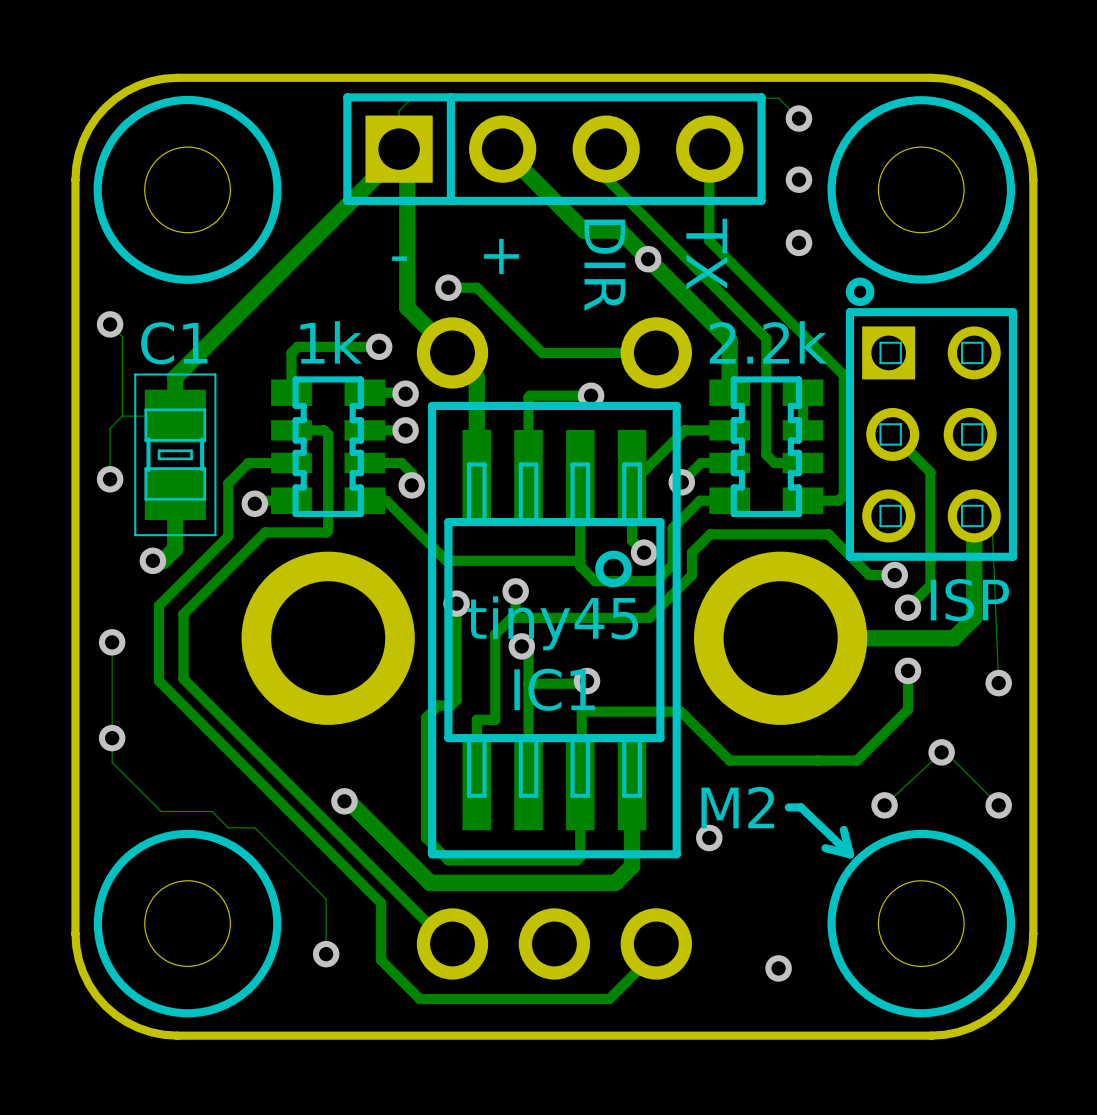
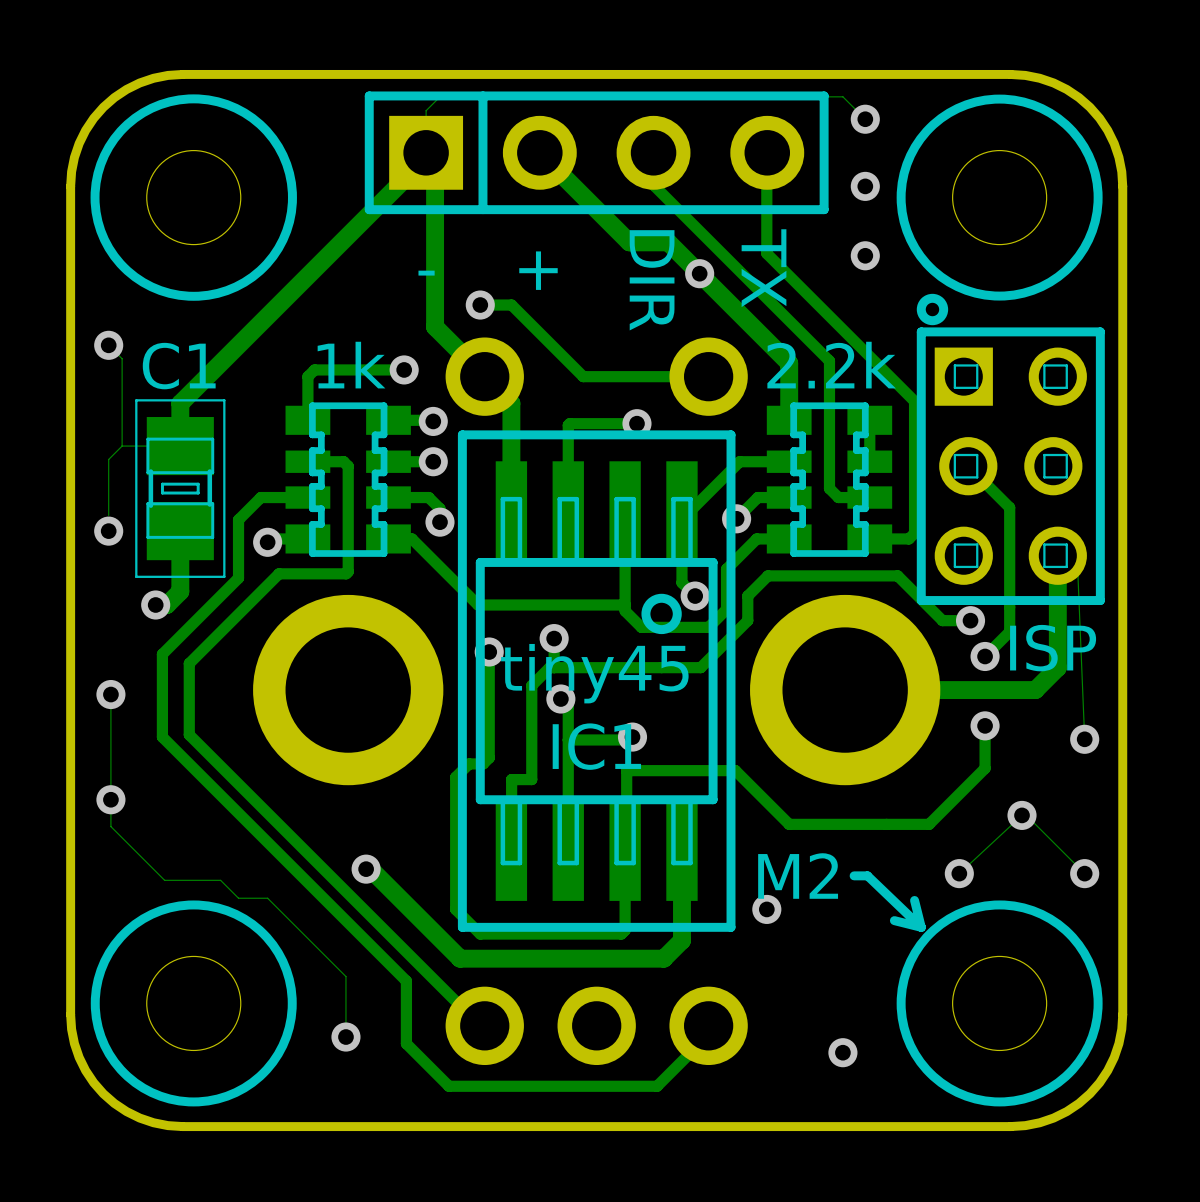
via position: (110, 479) -> (108, 531)

